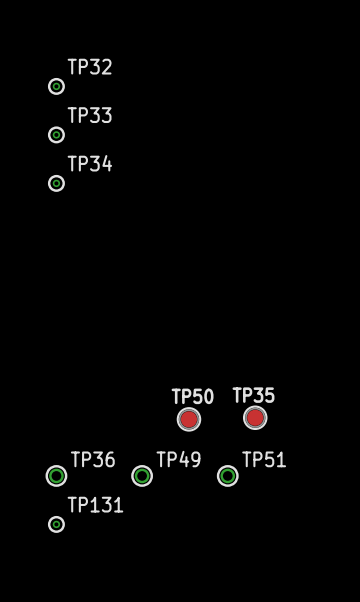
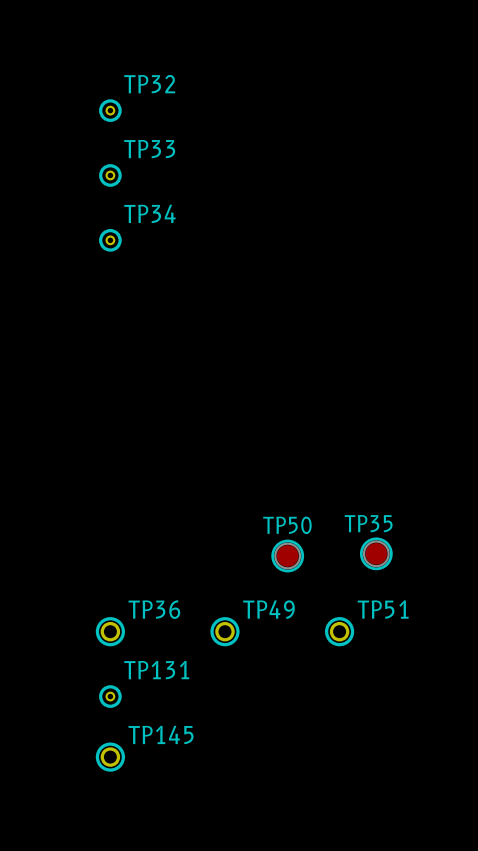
TP145: none -> (110, 757)

